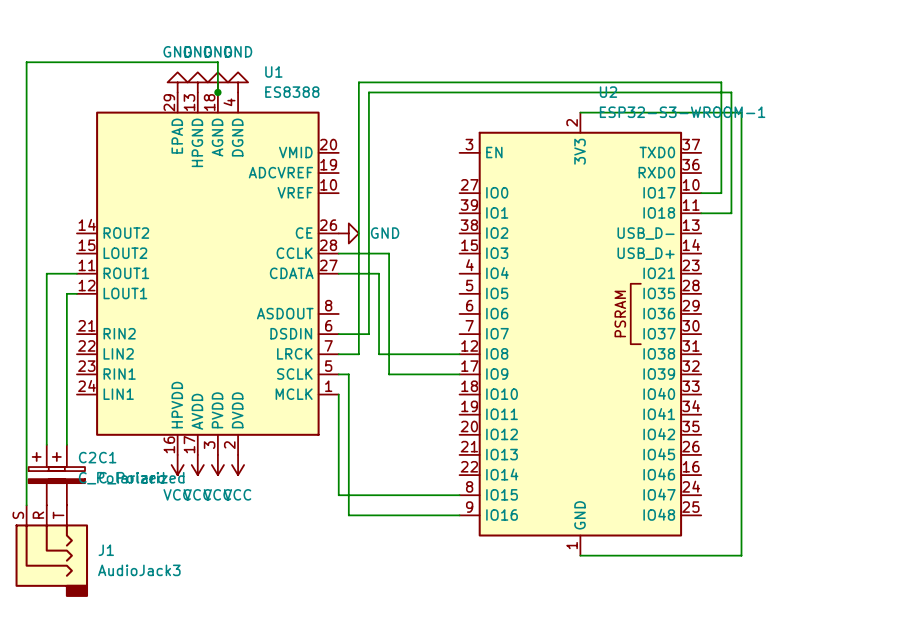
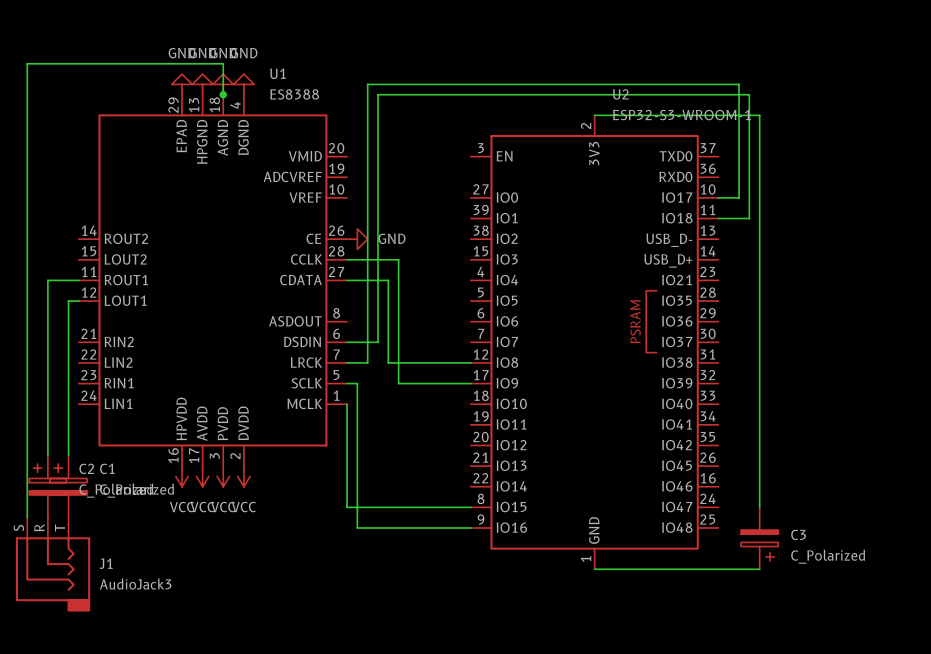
C3: none -> C_Polarized (759, 538)

